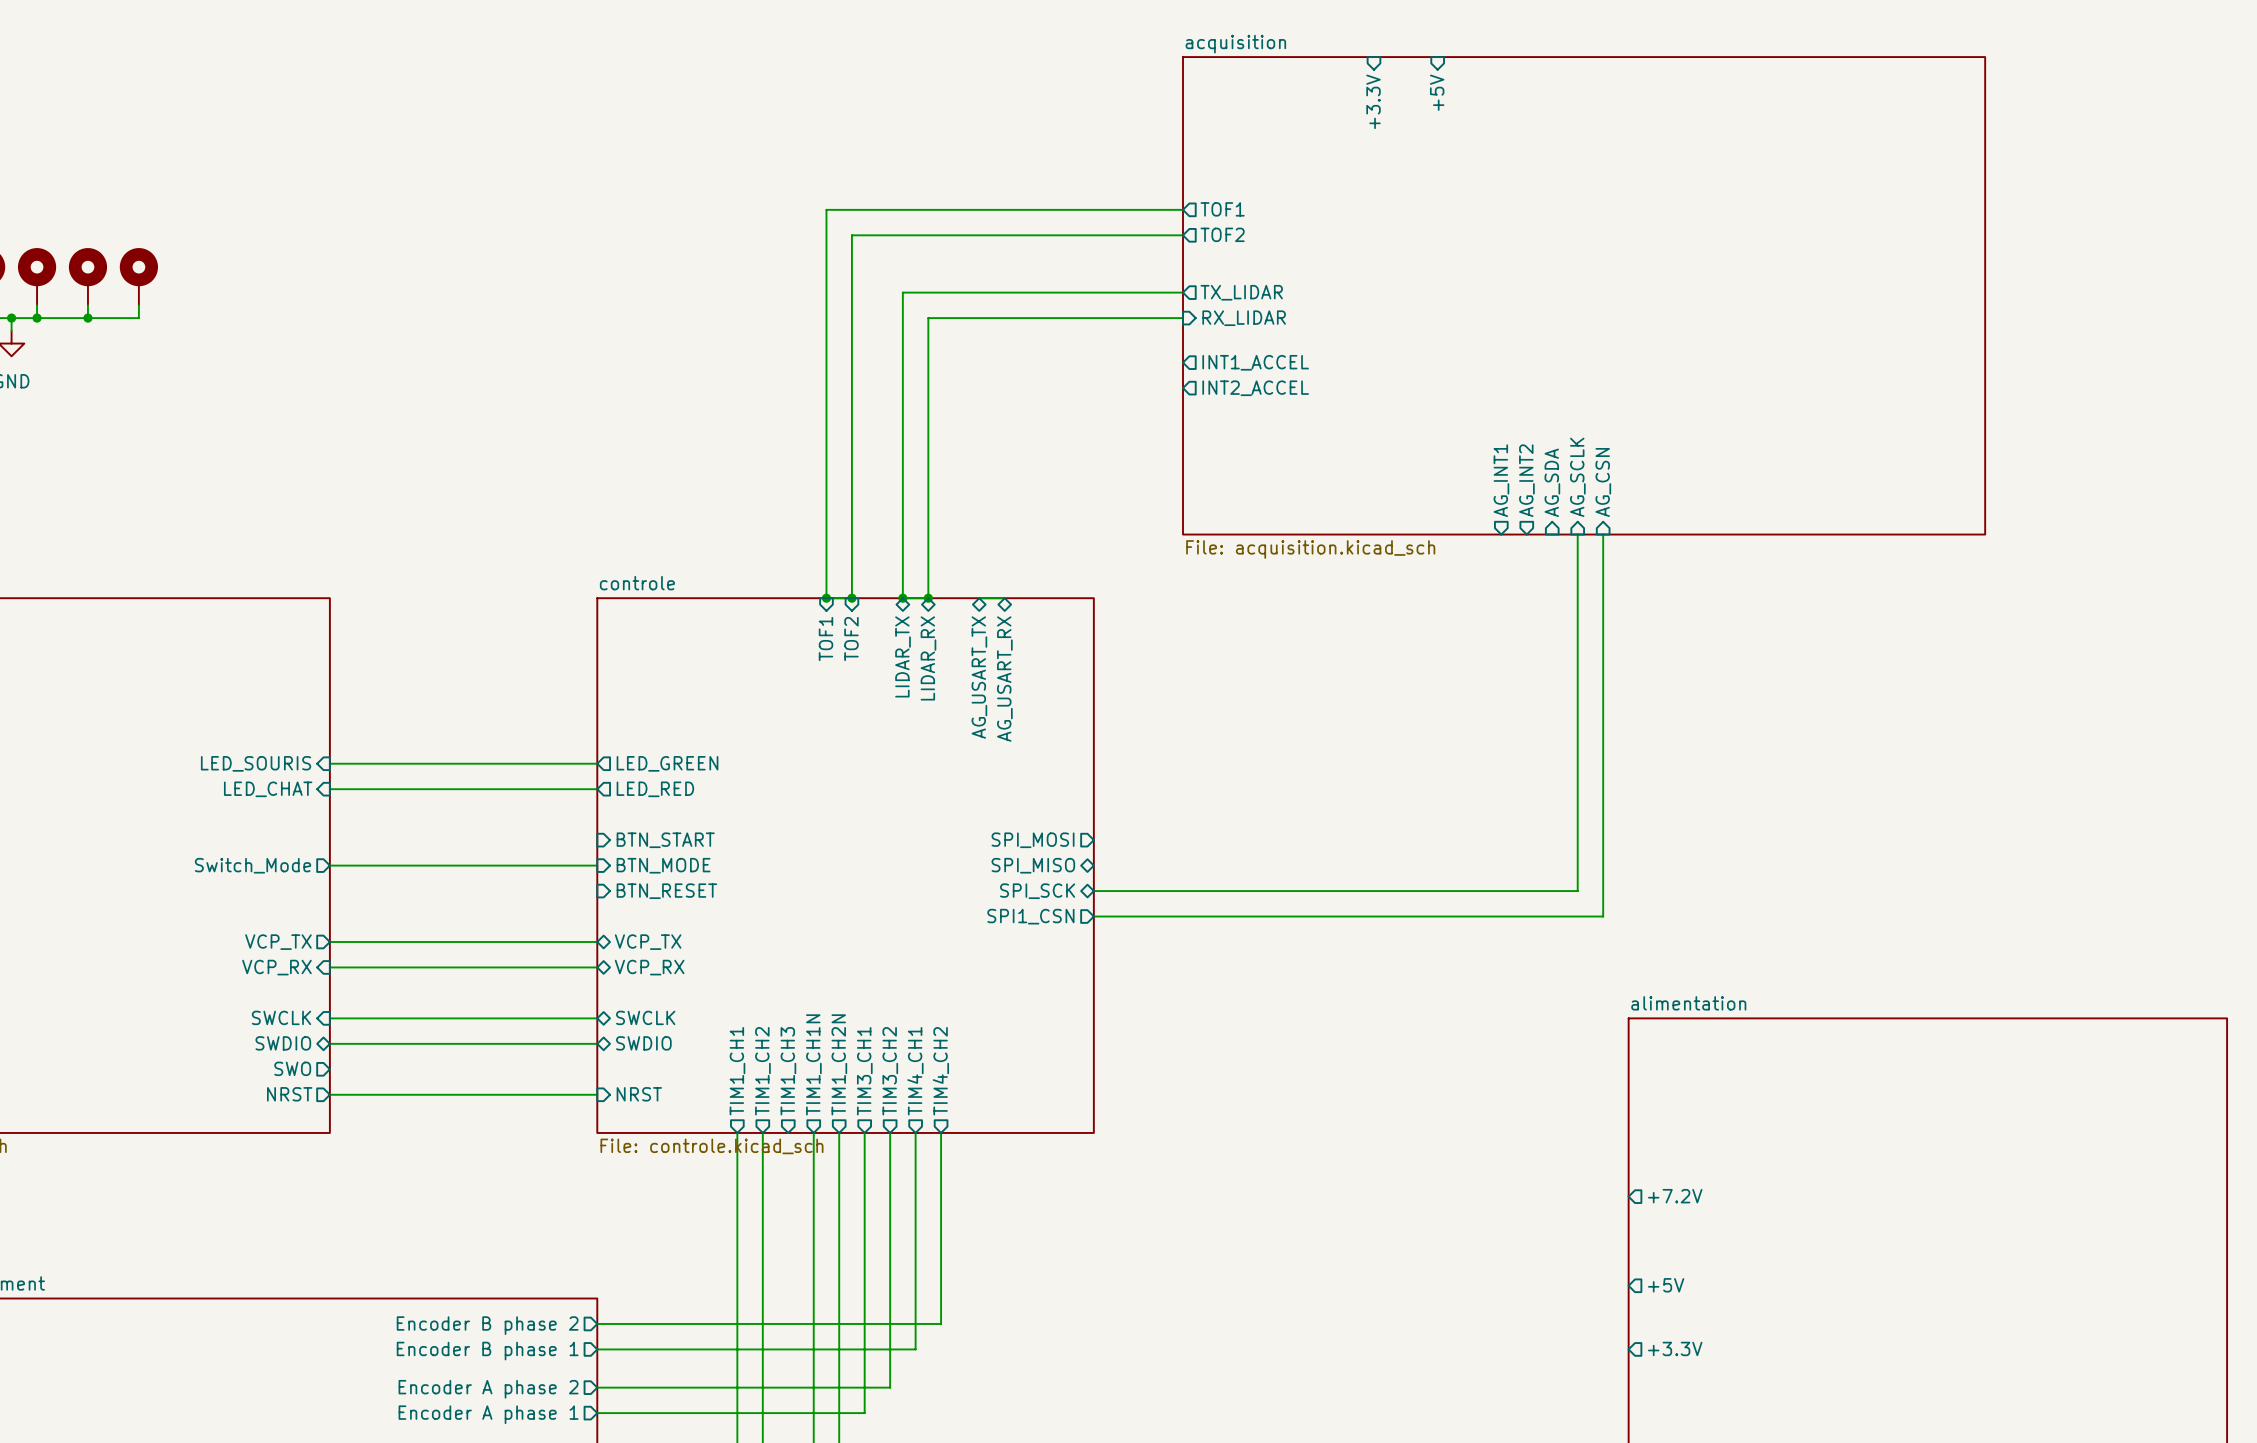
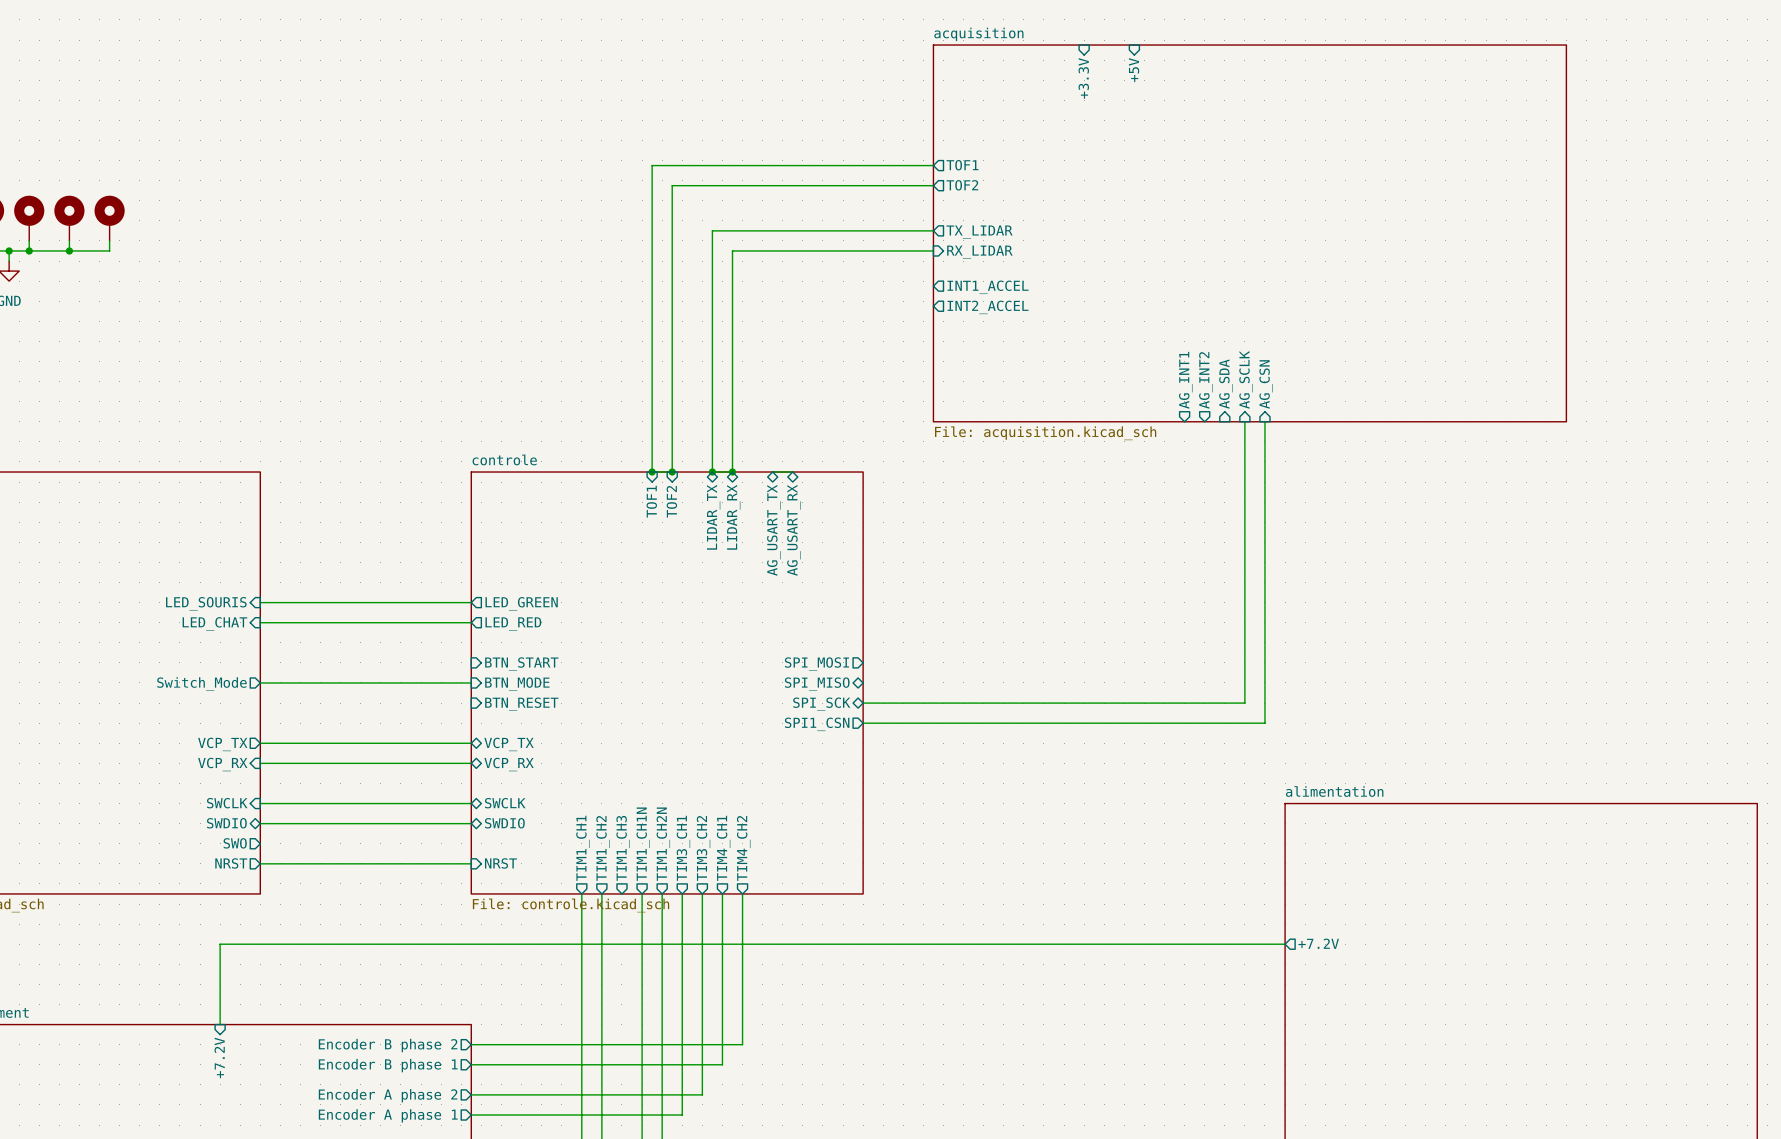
wire: none -> (1285, 944) (220, 944) (220, 1024)
sheet pin: +5V (1666, 1285) -> none
sheet pin: none -> +7.2V (219, 1057)
sheet pin: +3.3V (1675, 1348) -> none

